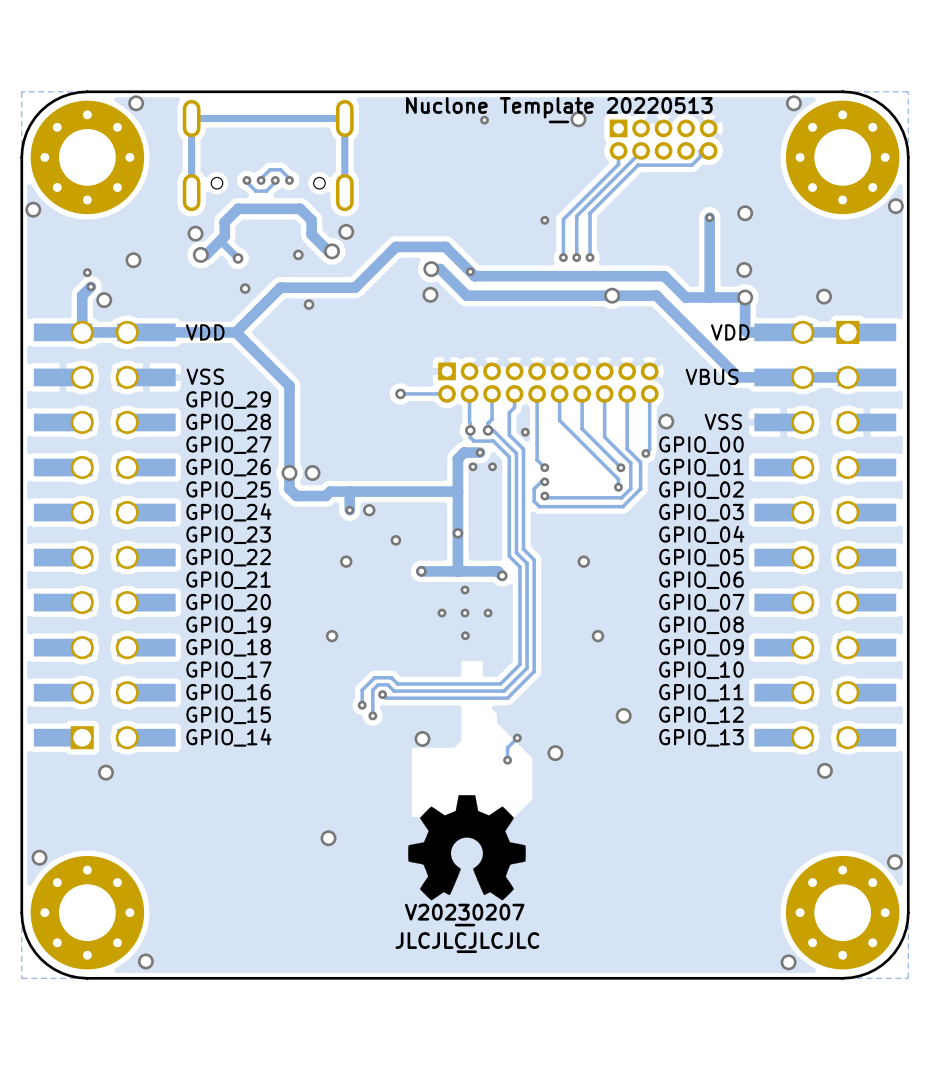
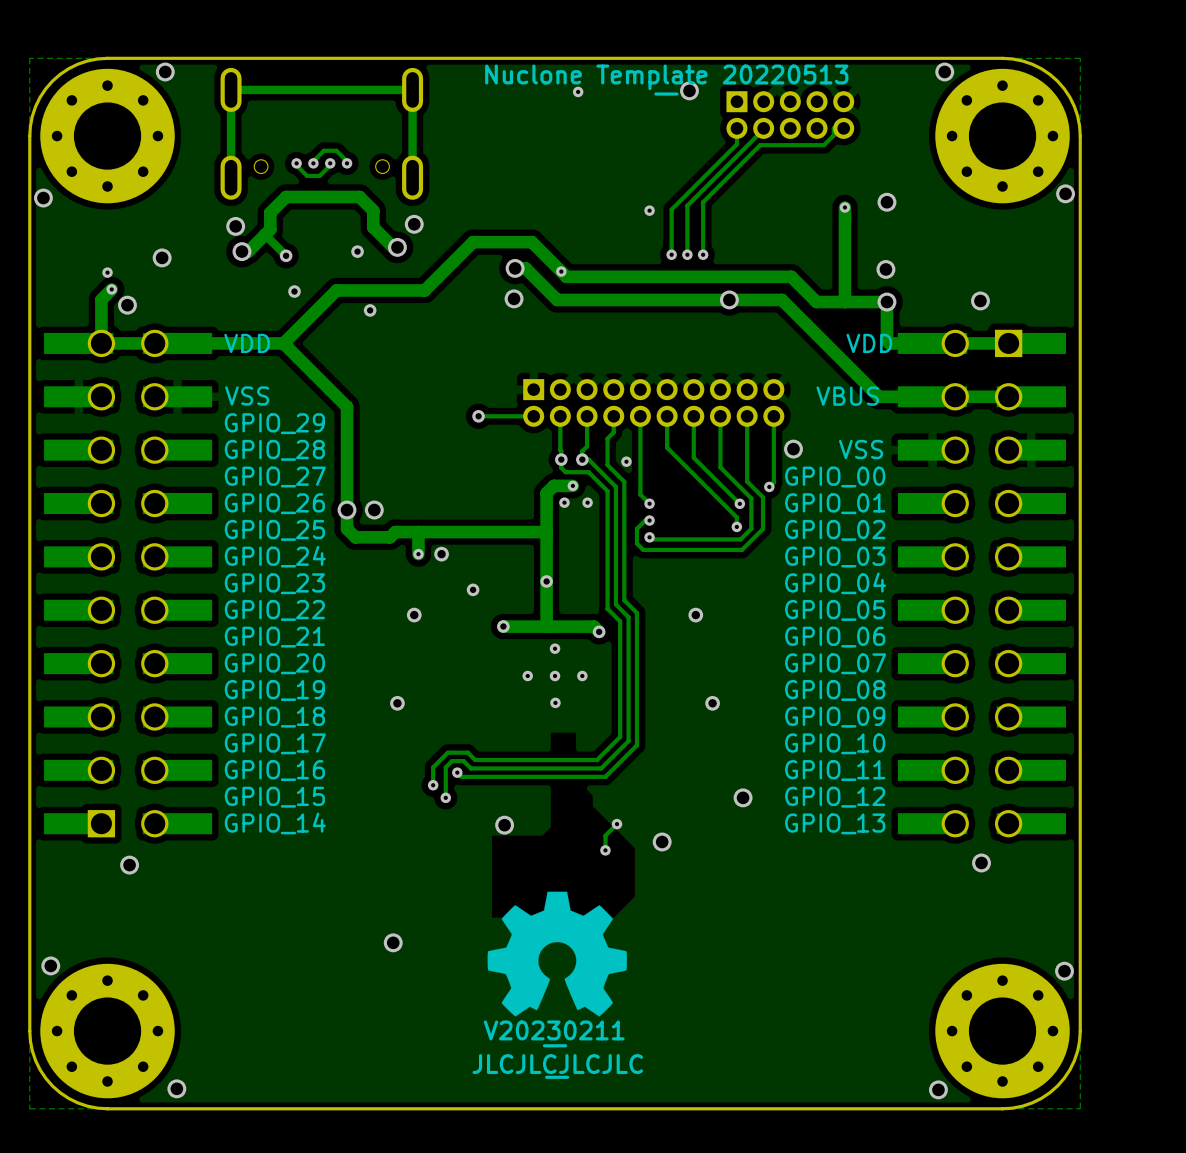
drawing shape: [404, 903, 525, 927] -> [483, 1020, 625, 1048]

